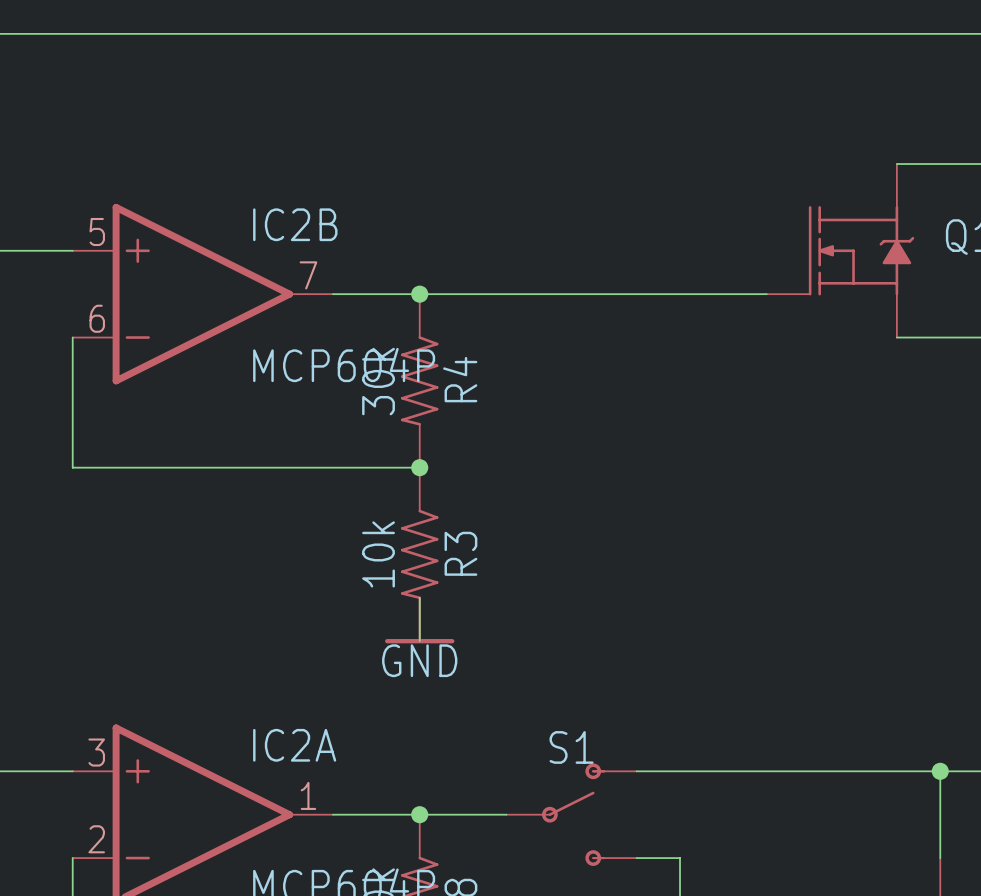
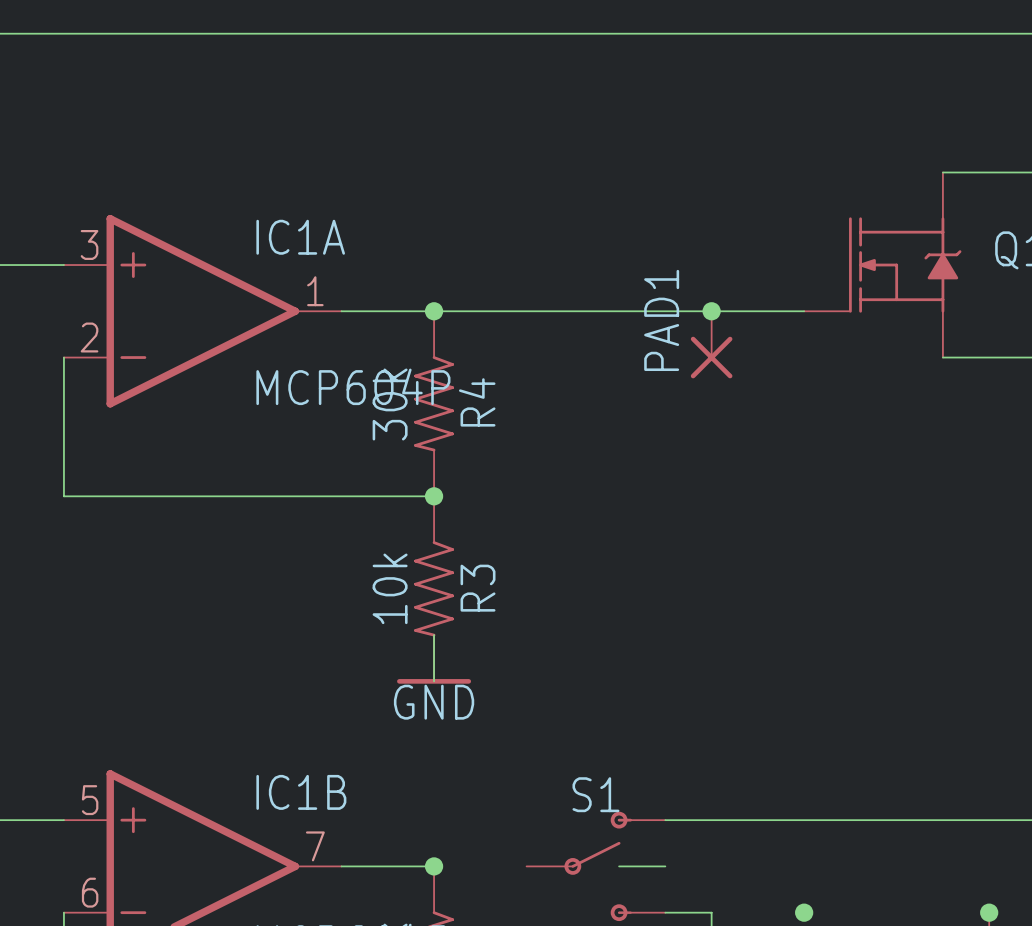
IC2B name: IC2B (295, 224) -> IC1A (300, 237)
IC2B pin number: 5 (97, 231) -> 3 (89, 244)
IC2B pin number: 7 (308, 275) -> 1 (315, 291)
junction: none -> (711, 311)
IC2B pin number: 6 (97, 318) -> 2 (89, 337)
PAD1: none -> (711, 344)
IC2A name: IC2A (294, 745) -> IC1B (301, 792)
IC2A pin number: 3 (96, 752) -> 5 (90, 800)
wire: (940, 771) (940, 858) -> none
junction position: (940, 771) -> (989, 912)
IC2A pin number: 1 (308, 795) -> 7 (315, 846)
wire: (419, 814) (506, 814) -> none
wire: none -> (619, 866) (665, 866)
IC2A pin number: 2 (96, 839) -> 6 (90, 892)
junction: none -> (804, 912)

